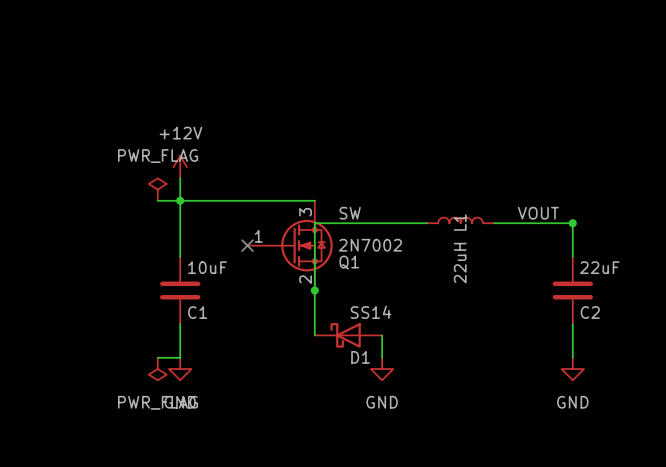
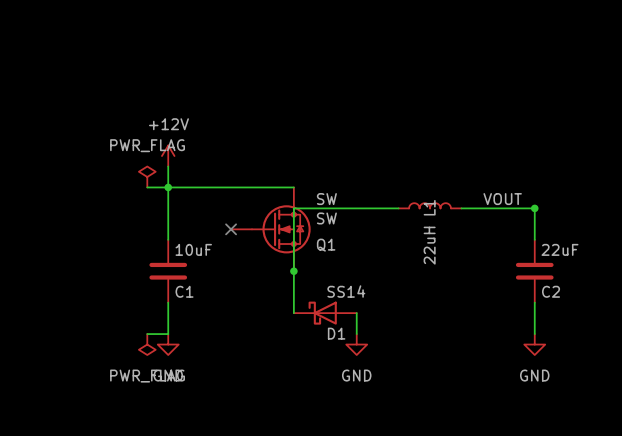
Q1 pin number: 3 (305, 212) -> none
Q1 pin number: 1 (258, 236) -> none
Q1 value: 2N7002 (370, 245) -> SW (326, 218)
Q1 pin number: 2 (305, 279) -> none

